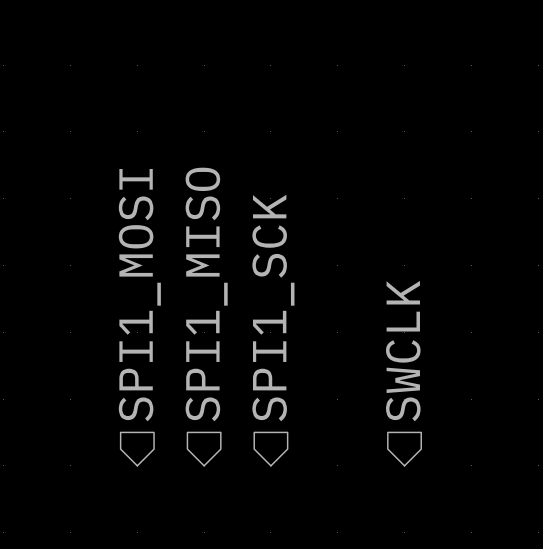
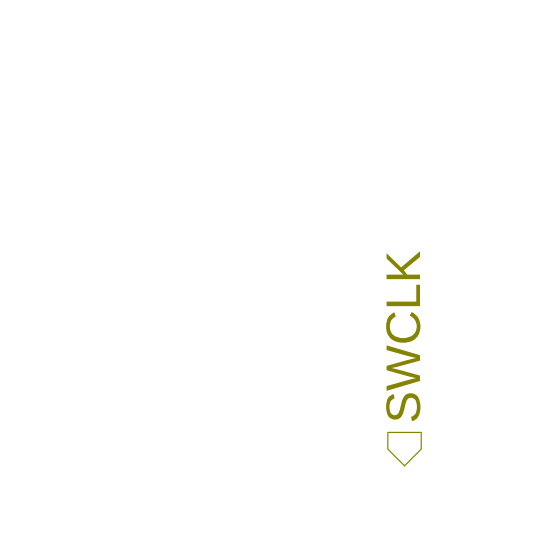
hierarchical label: SPI1_MISO (206, 294) -> none
hierarchical label: SPI1_MOSI (139, 295) -> none
hierarchical label: SPI1_SCK (273, 308) -> none

